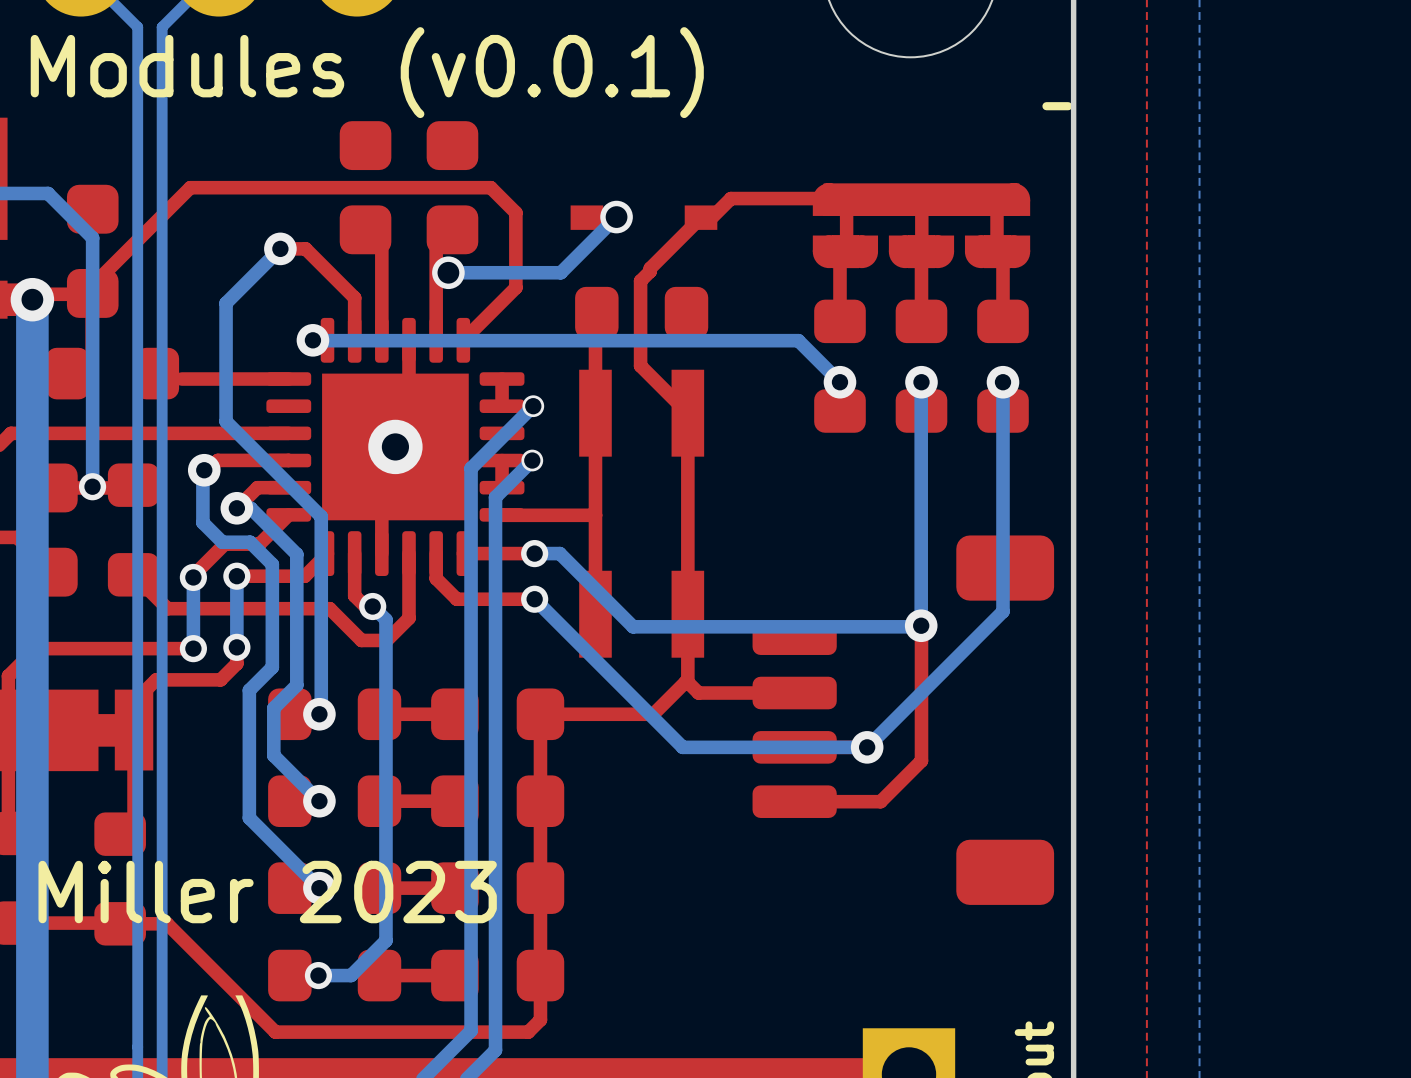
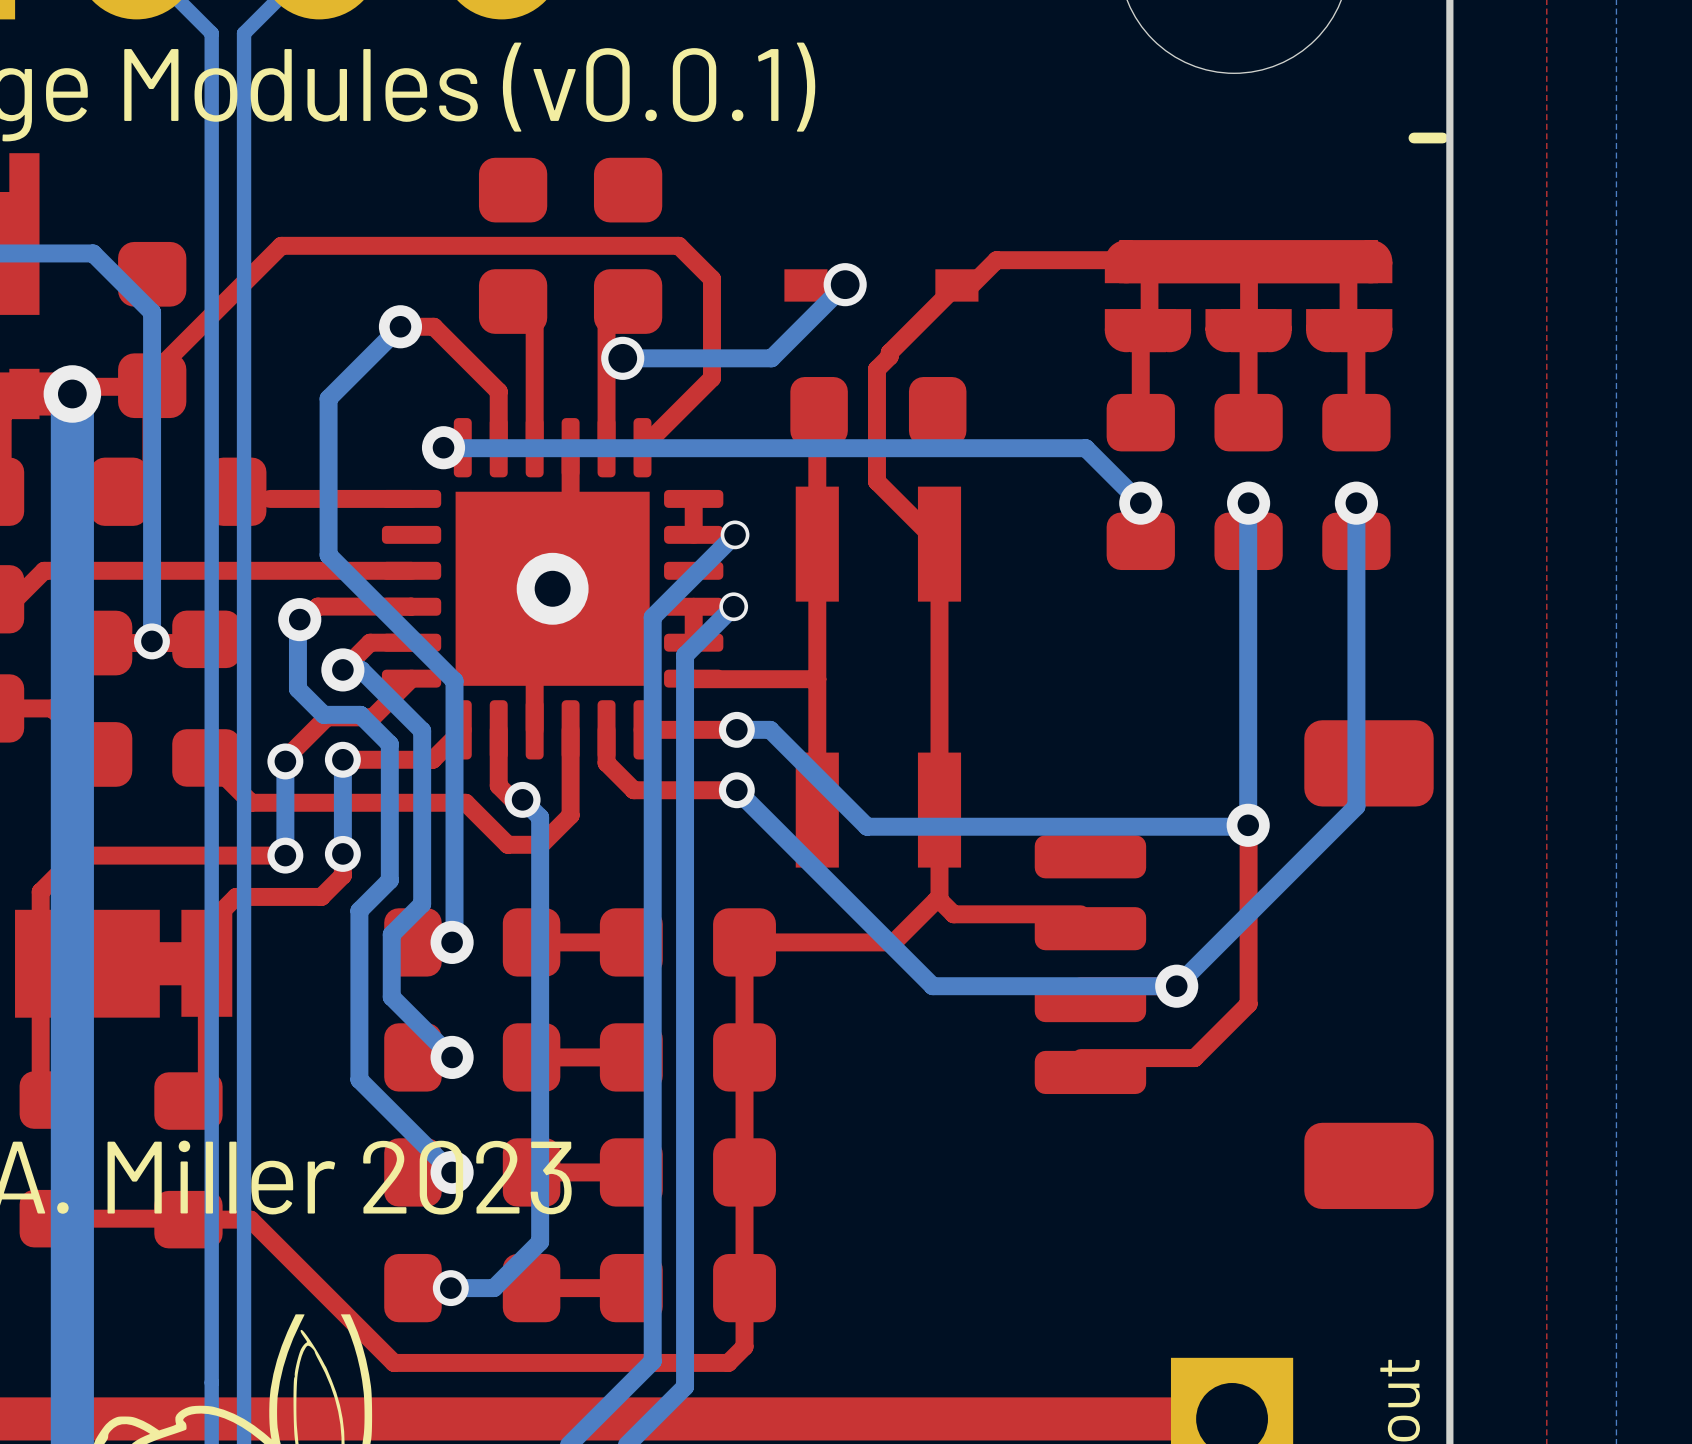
part position: (903, 720) -> (1234, 964)

